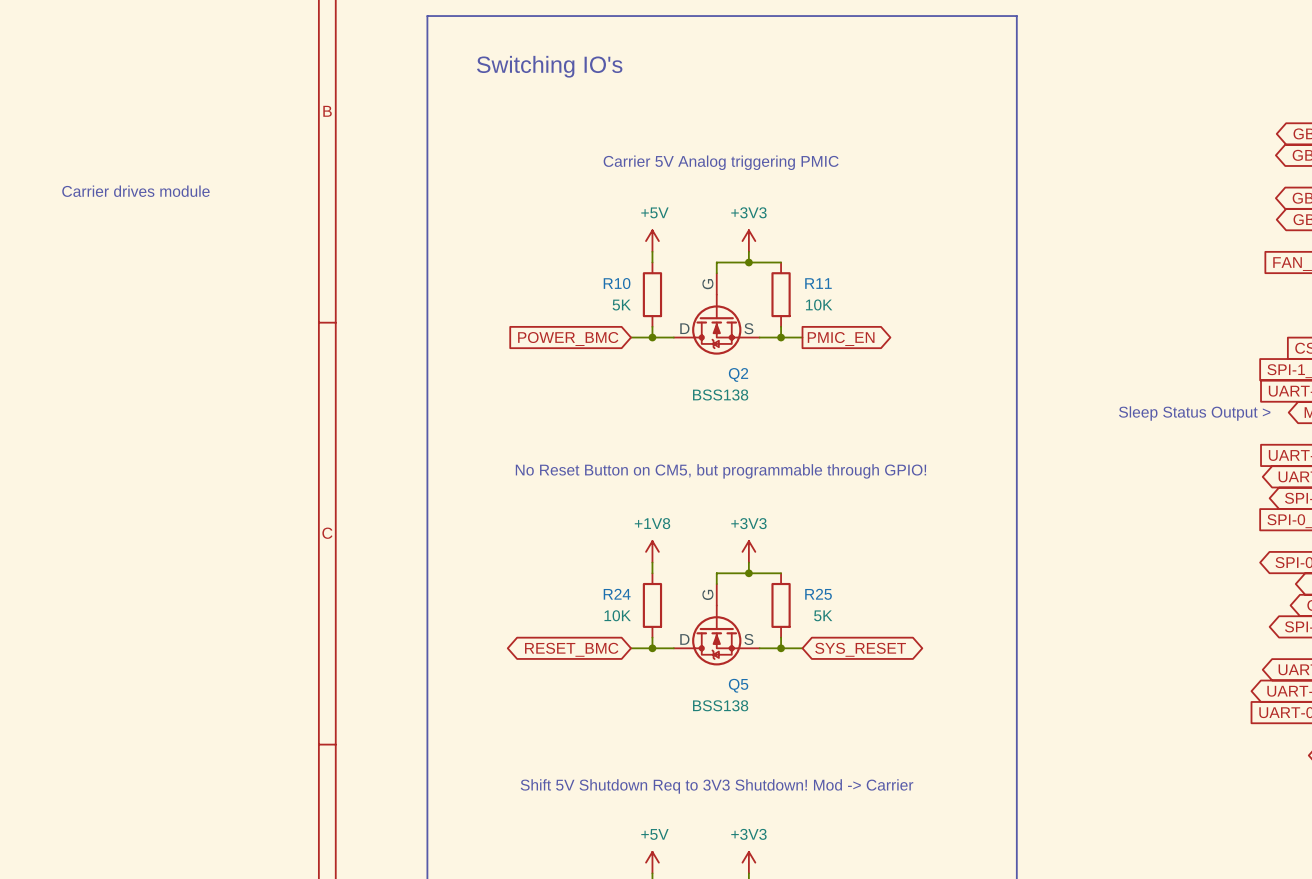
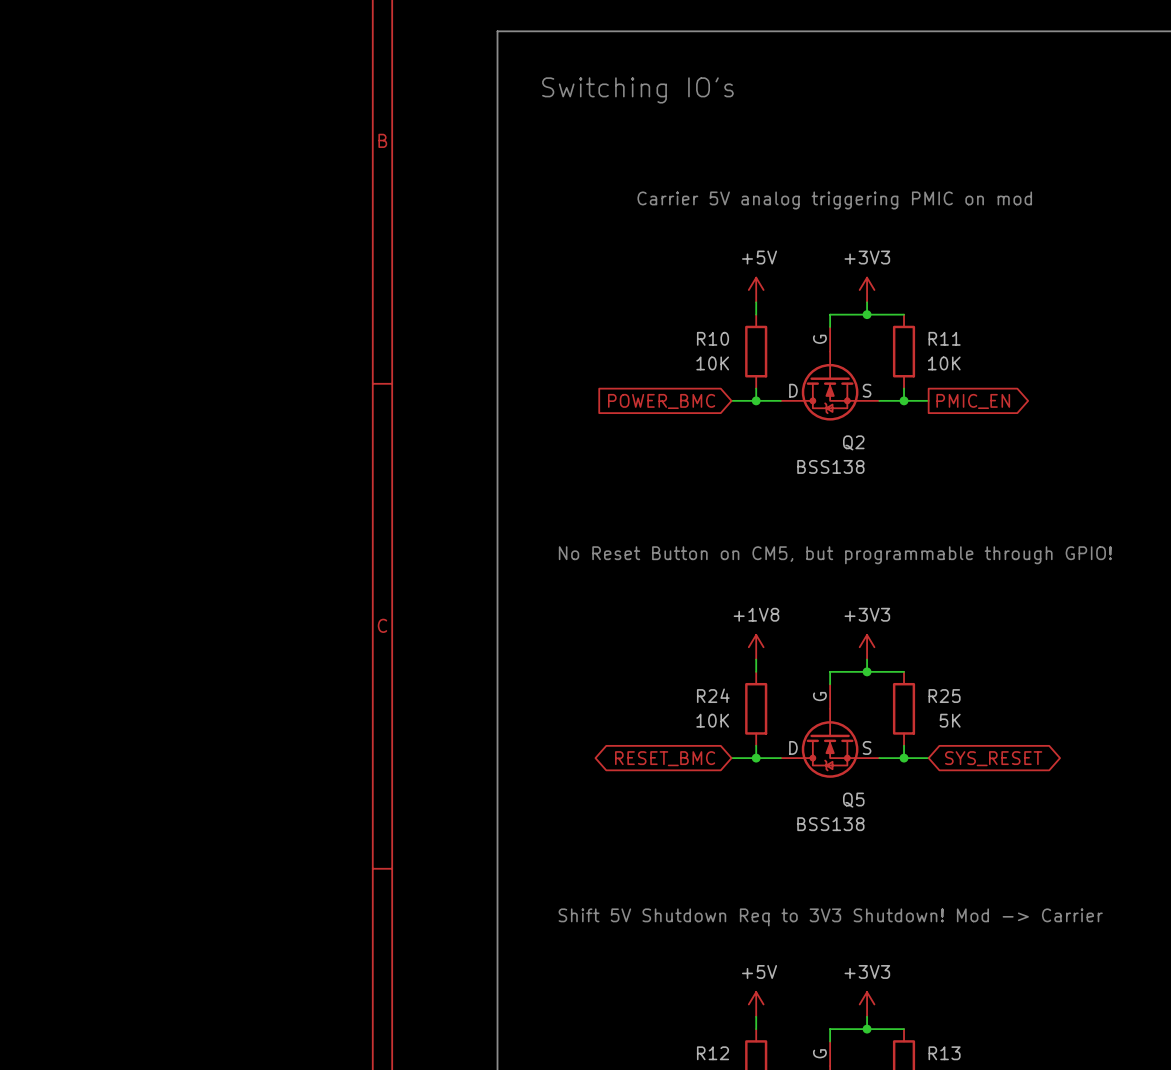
text: Carrier 5V Analog triggering PMIC (721, 162) -> Carrier 5V analog triggering PMIC on mod (834, 200)
text: Carrier drives module (135, 191) -> none
R10 value: 5K (621, 305) -> 10K (712, 363)

